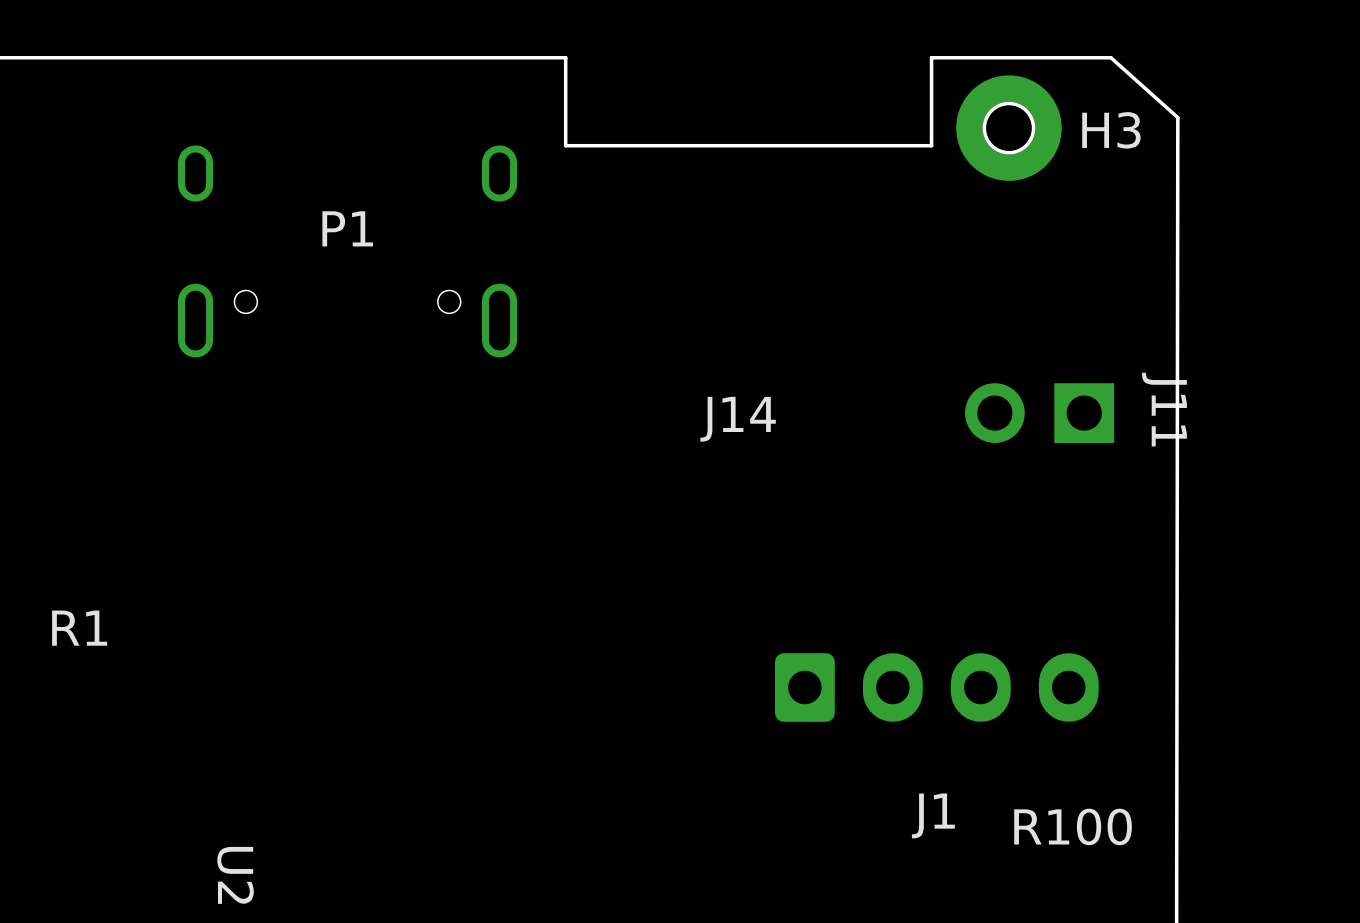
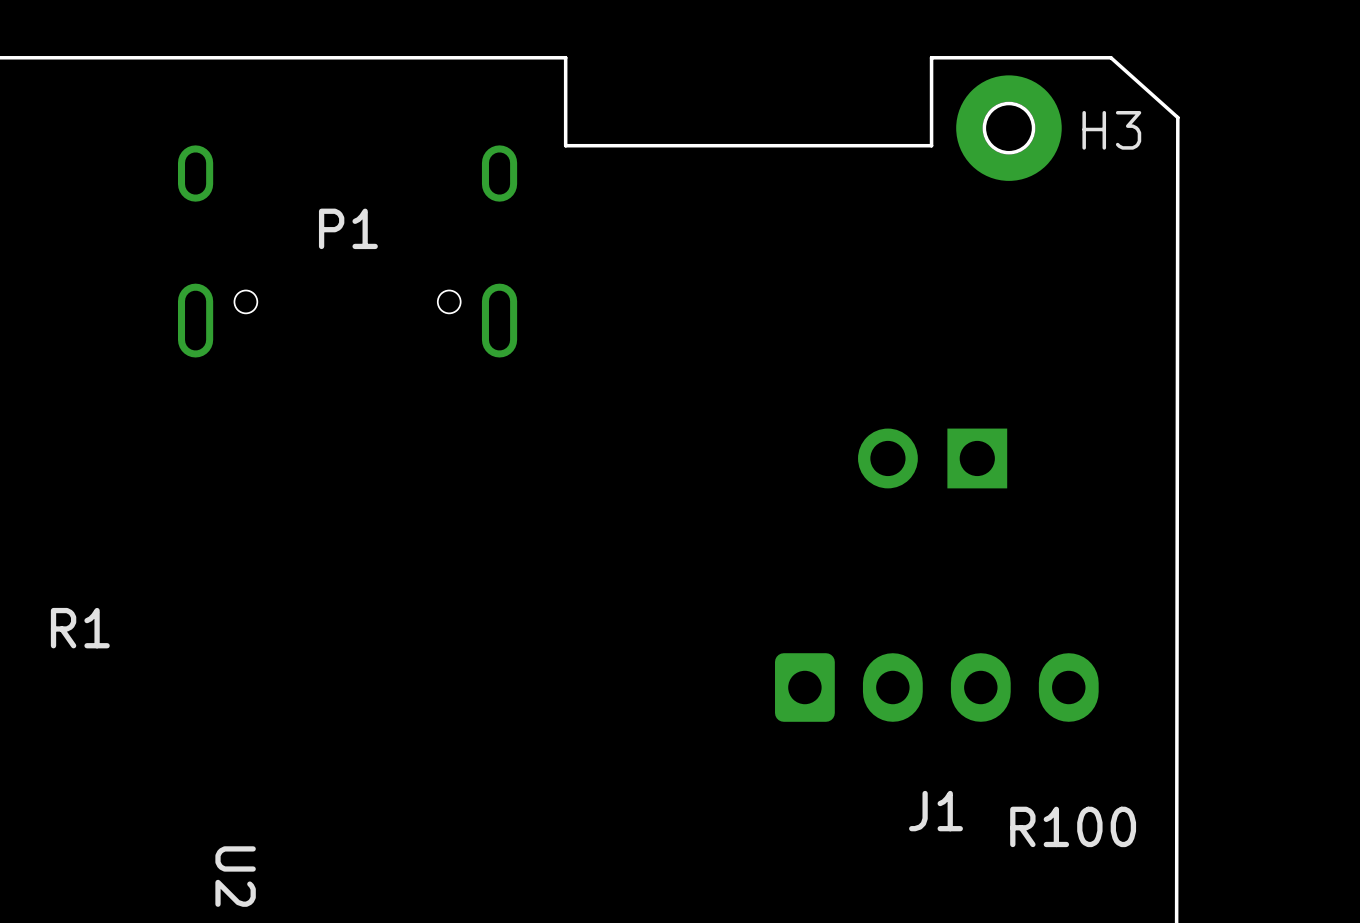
J11: (1039, 413) -> none
J14: (738, 419) -> none
part: none -> (932, 458)

